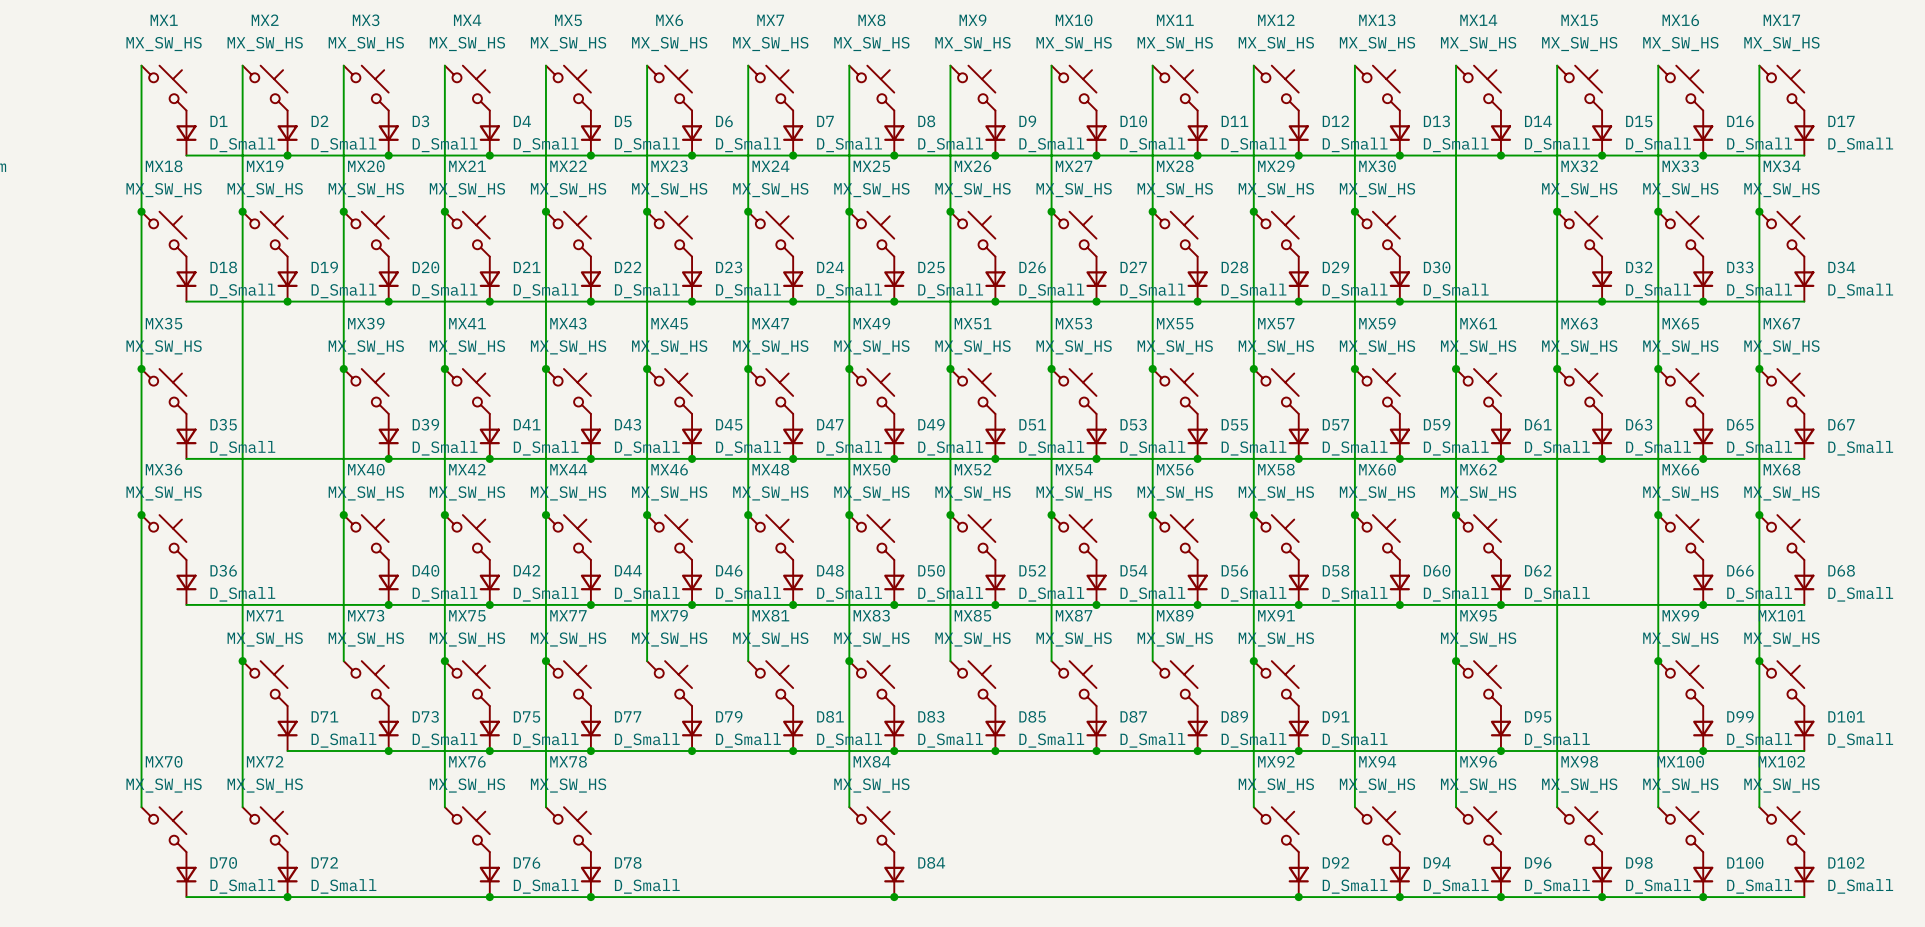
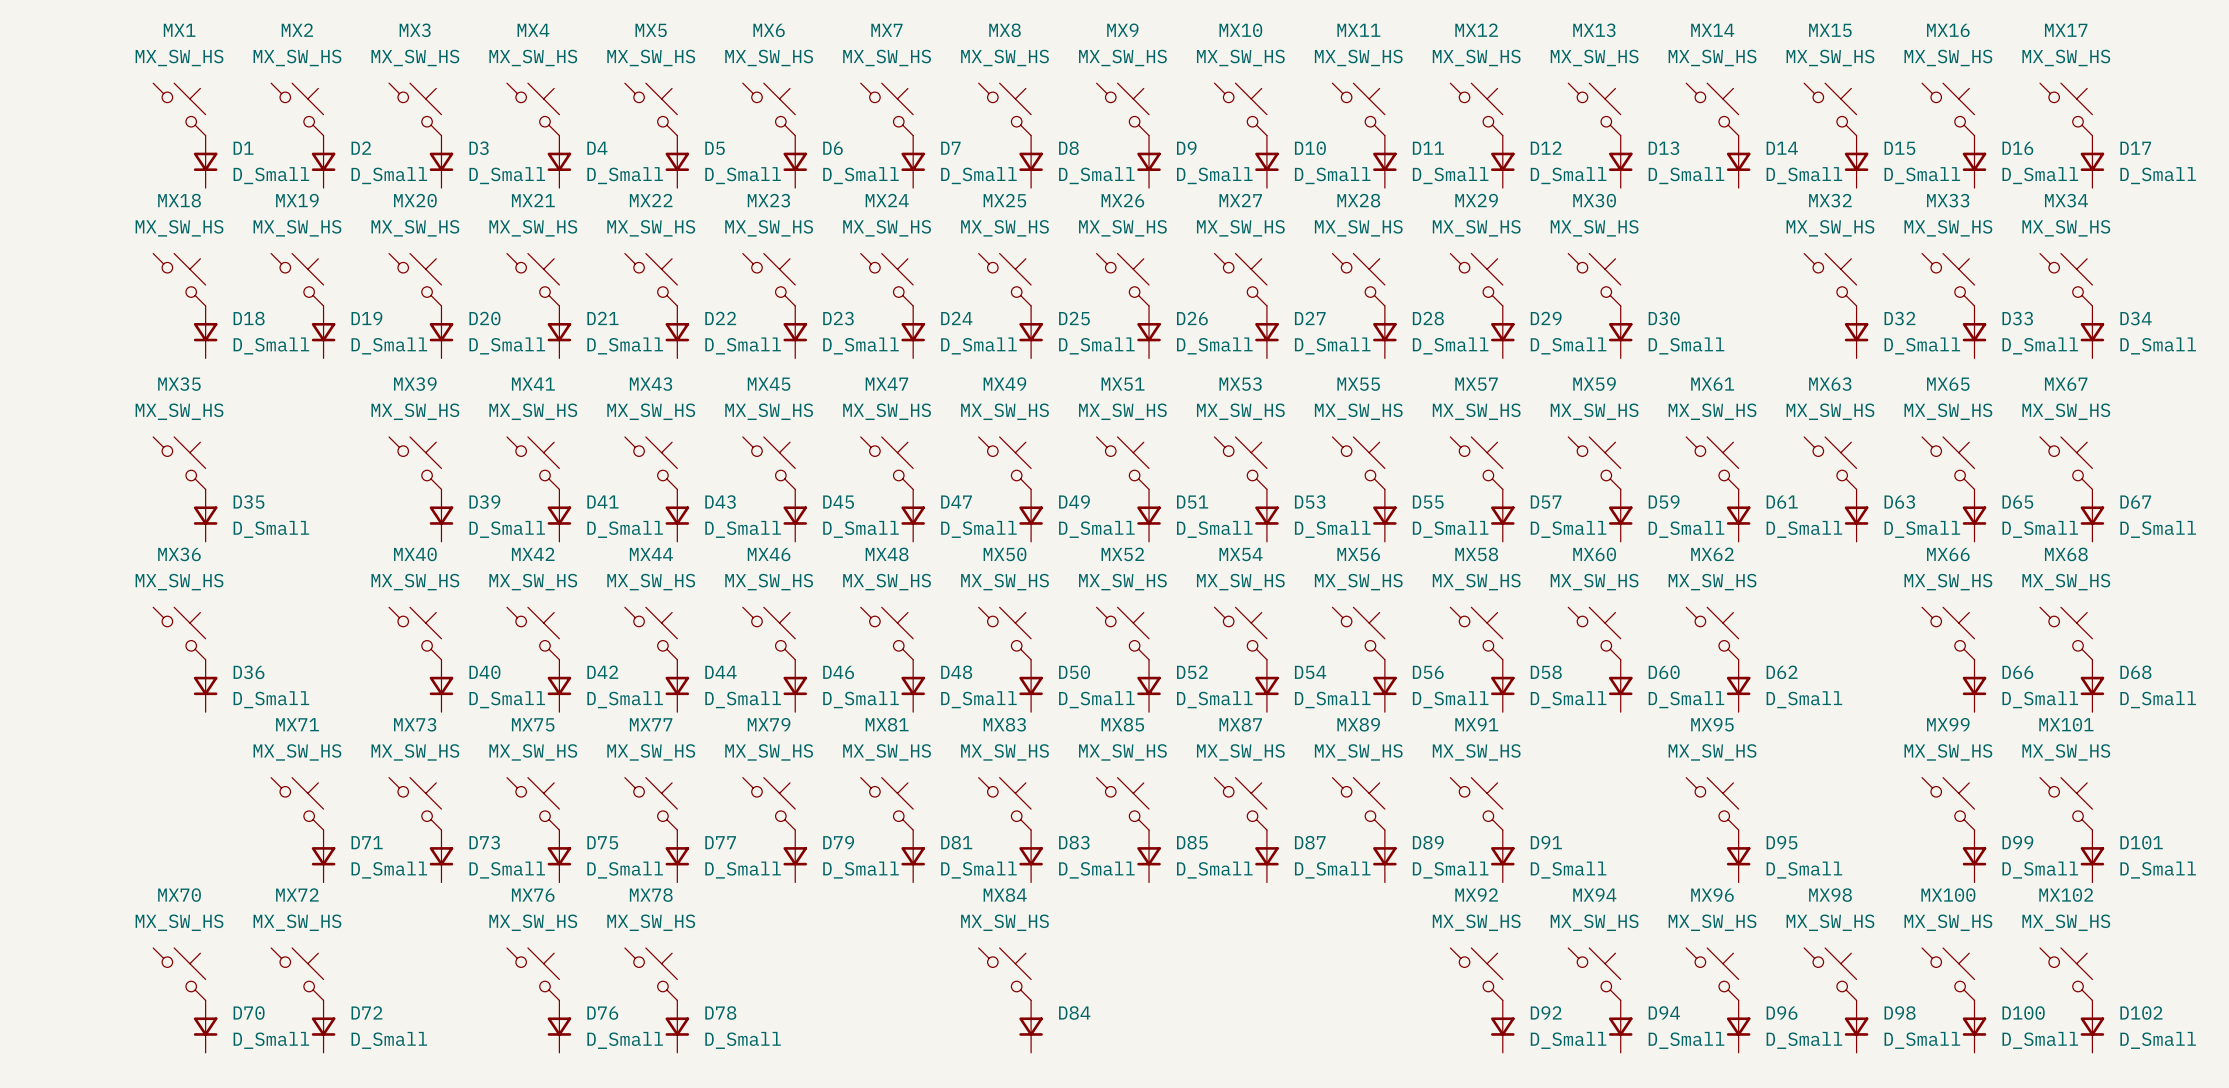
wire: (141, 65) (141, 807) -> none
wire: (242, 65) (242, 807) -> none
wire: (343, 65) (343, 661) -> none
wire: (444, 65) (444, 807) -> none
wire: (545, 65) (545, 807) -> none
wire: (647, 65) (647, 661) -> none
wire: (748, 65) (748, 661) -> none
wire: (849, 65) (849, 807) -> none
wire: (950, 65) (950, 661) -> none
wire: (1051, 65) (1051, 661) -> none
wire: (1152, 65) (1152, 661) -> none
wire: (1253, 65) (1253, 807) -> none
wire: (1354, 65) (1354, 807) -> none
wire: (1456, 65) (1456, 807) -> none
wire: (1557, 65) (1557, 807) -> none
wire: (1658, 65) (1658, 807) -> none
wire: (1759, 65) (1759, 807) -> none
wire: (186, 155) (1804, 155) -> none
junction: (287, 155) -> none
junction: (388, 155) -> none
junction: (489, 155) -> none
junction: (590, 155) -> none
junction: (692, 155) -> none
junction: (793, 155) -> none
junction: (894, 155) -> none
junction: (995, 155) -> none
junction: (1096, 155) -> none
junction: (1197, 155) -> none
junction: (1298, 155) -> none
junction: (1399, 155) -> none
junction: (1500, 155) -> none
junction: (1602, 155) -> none
junction: (1703, 155) -> none
junction: (141, 211) -> none
junction: (242, 211) -> none
junction: (343, 211) -> none
junction: (444, 211) -> none
junction: (545, 211) -> none
junction: (647, 211) -> none
junction: (748, 211) -> none
junction: (849, 211) -> none
junction: (950, 211) -> none
junction: (1051, 211) -> none
junction: (1152, 211) -> none
junction: (1253, 211) -> none
junction: (1354, 211) -> none
junction: (1557, 211) -> none
junction: (1658, 211) -> none
junction: (1759, 211) -> none
wire: (186, 301) (1804, 301) -> none
junction: (287, 301) -> none
junction: (388, 301) -> none
junction: (489, 301) -> none
junction: (590, 301) -> none
junction: (692, 301) -> none
junction: (793, 301) -> none
junction: (894, 301) -> none
junction: (995, 301) -> none
junction: (1096, 301) -> none
junction: (1197, 301) -> none
junction: (1298, 301) -> none
junction: (1399, 301) -> none
junction: (1602, 301) -> none
junction: (1703, 301) -> none
junction: (141, 369) -> none
junction: (343, 369) -> none
junction: (444, 369) -> none
junction: (545, 369) -> none
junction: (647, 369) -> none
junction: (748, 369) -> none
junction: (849, 369) -> none
junction: (950, 369) -> none
junction: (1051, 369) -> none
junction: (1152, 369) -> none
junction: (1253, 369) -> none
junction: (1354, 369) -> none
junction: (1456, 369) -> none
junction: (1557, 369) -> none
junction: (1658, 369) -> none
junction: (1759, 369) -> none
wire: (186, 458) (1804, 458) -> none
junction: (388, 458) -> none
junction: (489, 458) -> none
junction: (590, 458) -> none
junction: (692, 458) -> none
junction: (793, 458) -> none
junction: (894, 458) -> none
junction: (995, 458) -> none
junction: (1096, 458) -> none
junction: (1197, 458) -> none
junction: (1298, 458) -> none
junction: (1399, 458) -> none
junction: (1500, 458) -> none
junction: (1602, 458) -> none
junction: (1703, 458) -> none
junction: (141, 515) -> none
junction: (343, 515) -> none
junction: (444, 515) -> none
junction: (545, 515) -> none
junction: (647, 515) -> none
junction: (748, 515) -> none
junction: (849, 515) -> none
junction: (950, 515) -> none
junction: (1051, 515) -> none
junction: (1152, 515) -> none
junction: (1253, 515) -> none
junction: (1354, 515) -> none
junction: (1456, 515) -> none
junction: (1658, 515) -> none
junction: (1759, 515) -> none
wire: (186, 604) (1804, 604) -> none
junction: (388, 604) -> none
junction: (489, 604) -> none
junction: (590, 604) -> none
junction: (692, 604) -> none
junction: (793, 604) -> none
junction: (894, 604) -> none
junction: (995, 604) -> none
junction: (1096, 604) -> none
junction: (1197, 604) -> none
junction: (1298, 604) -> none
junction: (1399, 604) -> none
junction: (1500, 604) -> none
junction: (1703, 604) -> none
junction: (242, 661) -> none
junction: (444, 661) -> none
junction: (545, 661) -> none
junction: (849, 661) -> none
junction: (1253, 661) -> none
junction: (1456, 661) -> none
junction: (1658, 661) -> none
junction: (1759, 661) -> none
wire: (287, 751) (1804, 751) -> none
junction: (388, 751) -> none
junction: (489, 751) -> none
junction: (590, 751) -> none
junction: (692, 751) -> none
junction: (793, 751) -> none
junction: (894, 751) -> none
junction: (995, 751) -> none
junction: (1096, 751) -> none
junction: (1197, 751) -> none
junction: (1298, 751) -> none
junction: (1500, 751) -> none
junction: (1703, 751) -> none
wire: (186, 897) (1804, 897) -> none
junction: (287, 897) -> none
junction: (489, 897) -> none
junction: (590, 897) -> none
junction: (894, 897) -> none
junction: (1298, 897) -> none
junction: (1399, 897) -> none
junction: (1500, 897) -> none
junction: (1602, 897) -> none
junction: (1703, 897) -> none

